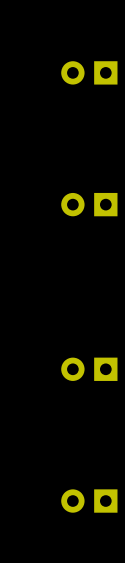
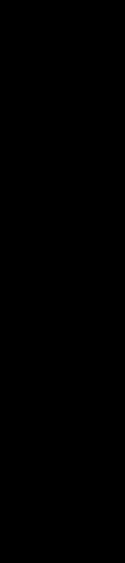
part: (89, 72) -> none
part: (89, 204) -> none
part: (89, 369) -> none
part: (89, 501) -> none

